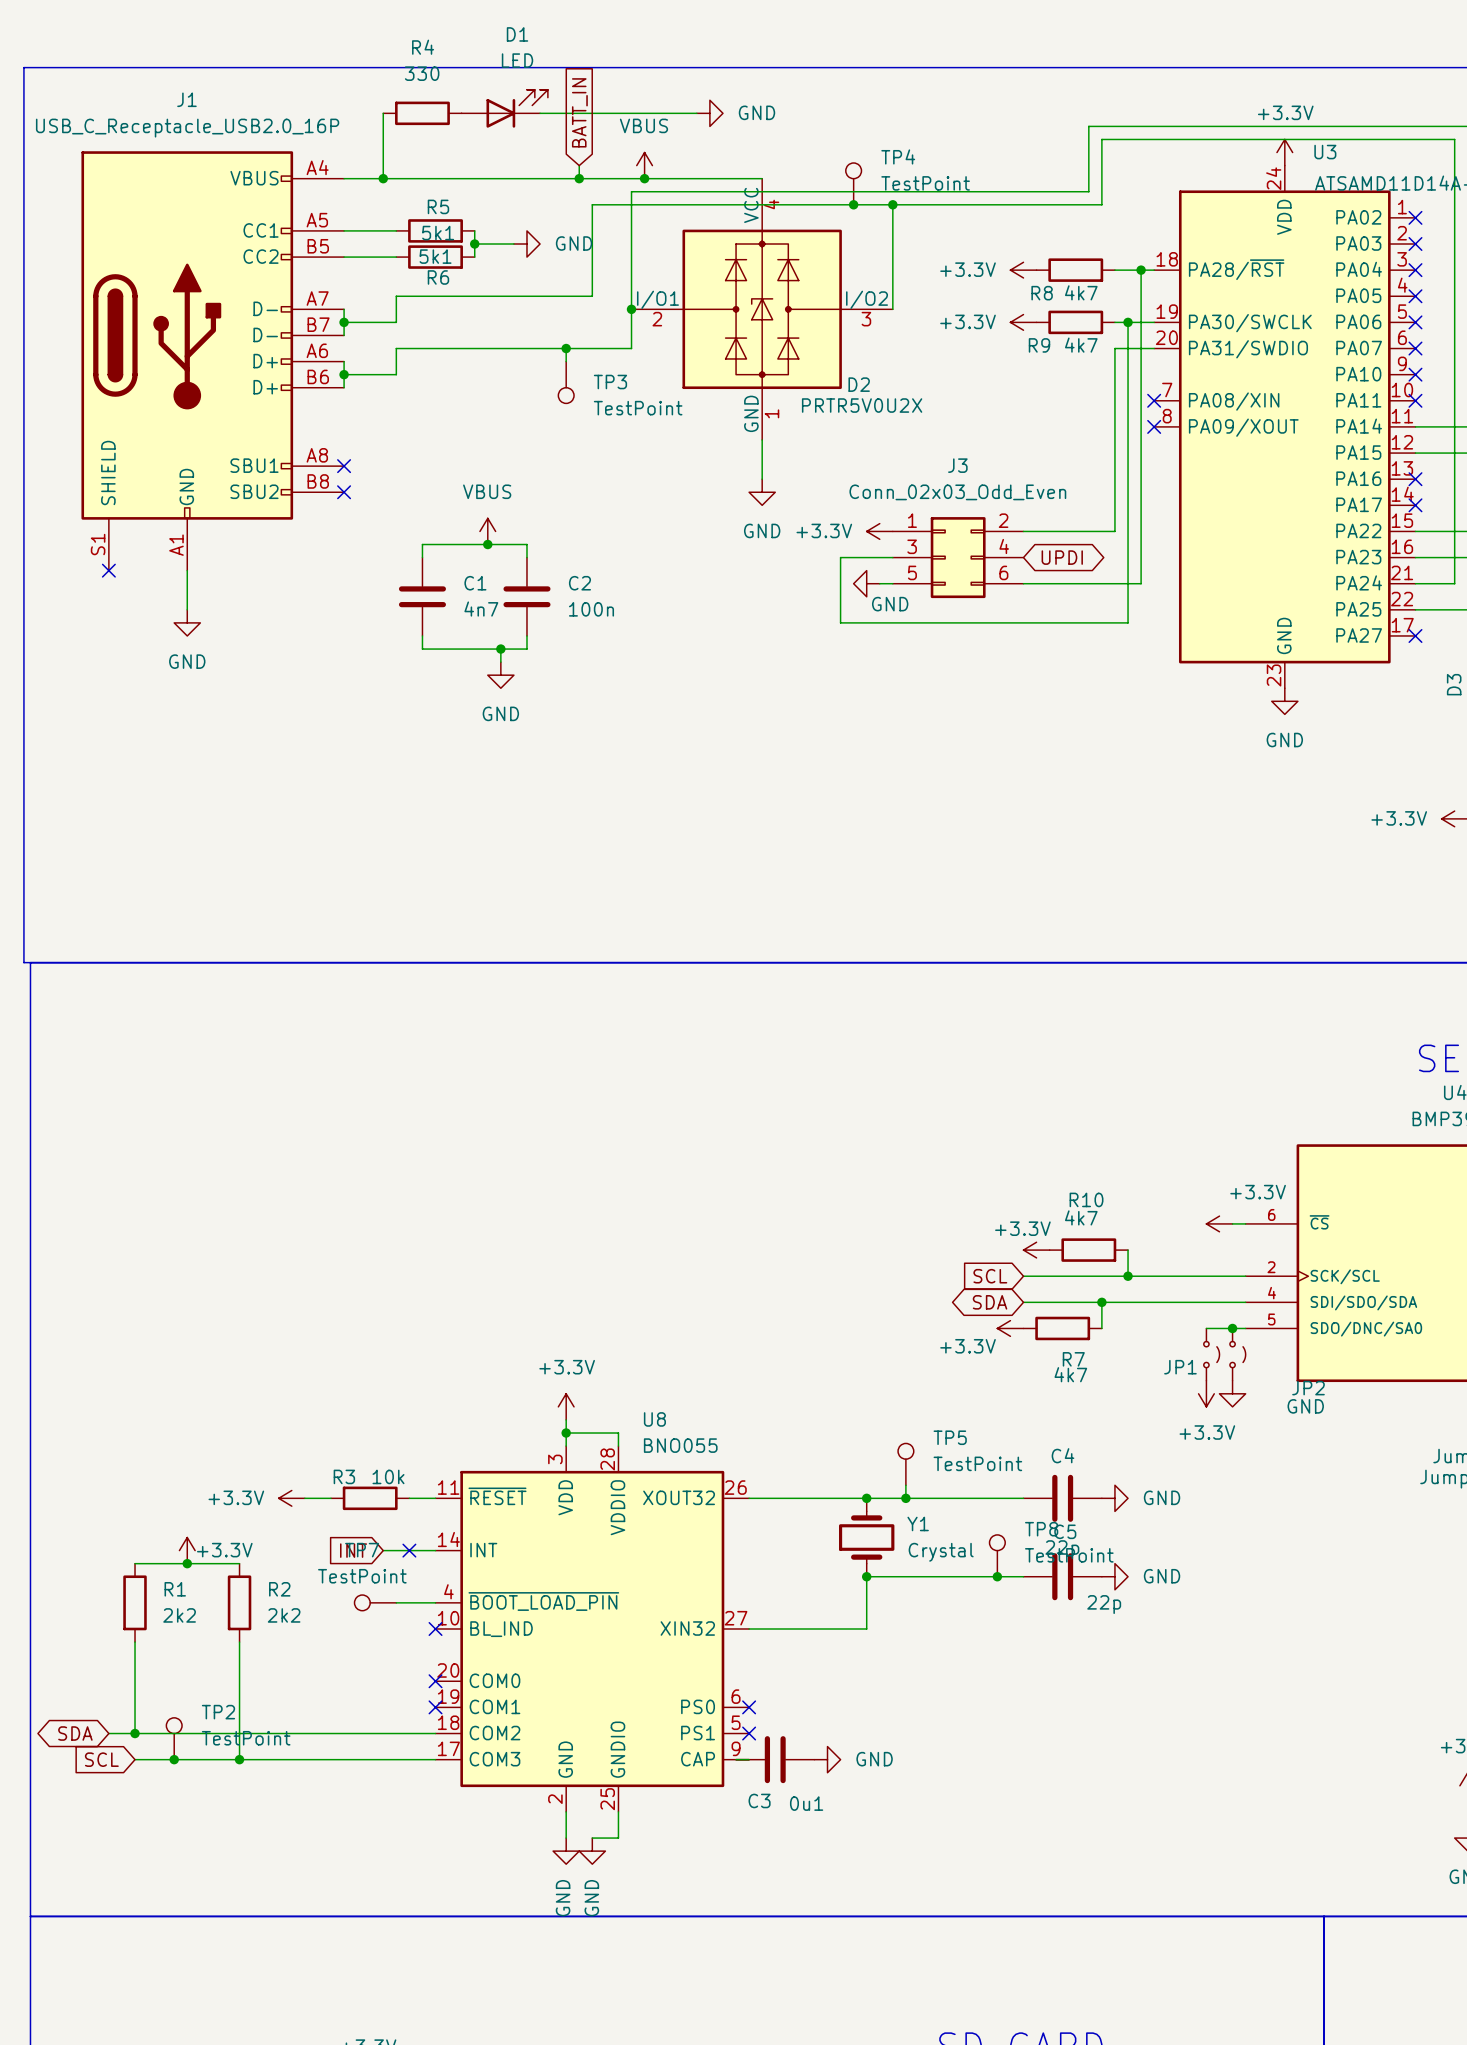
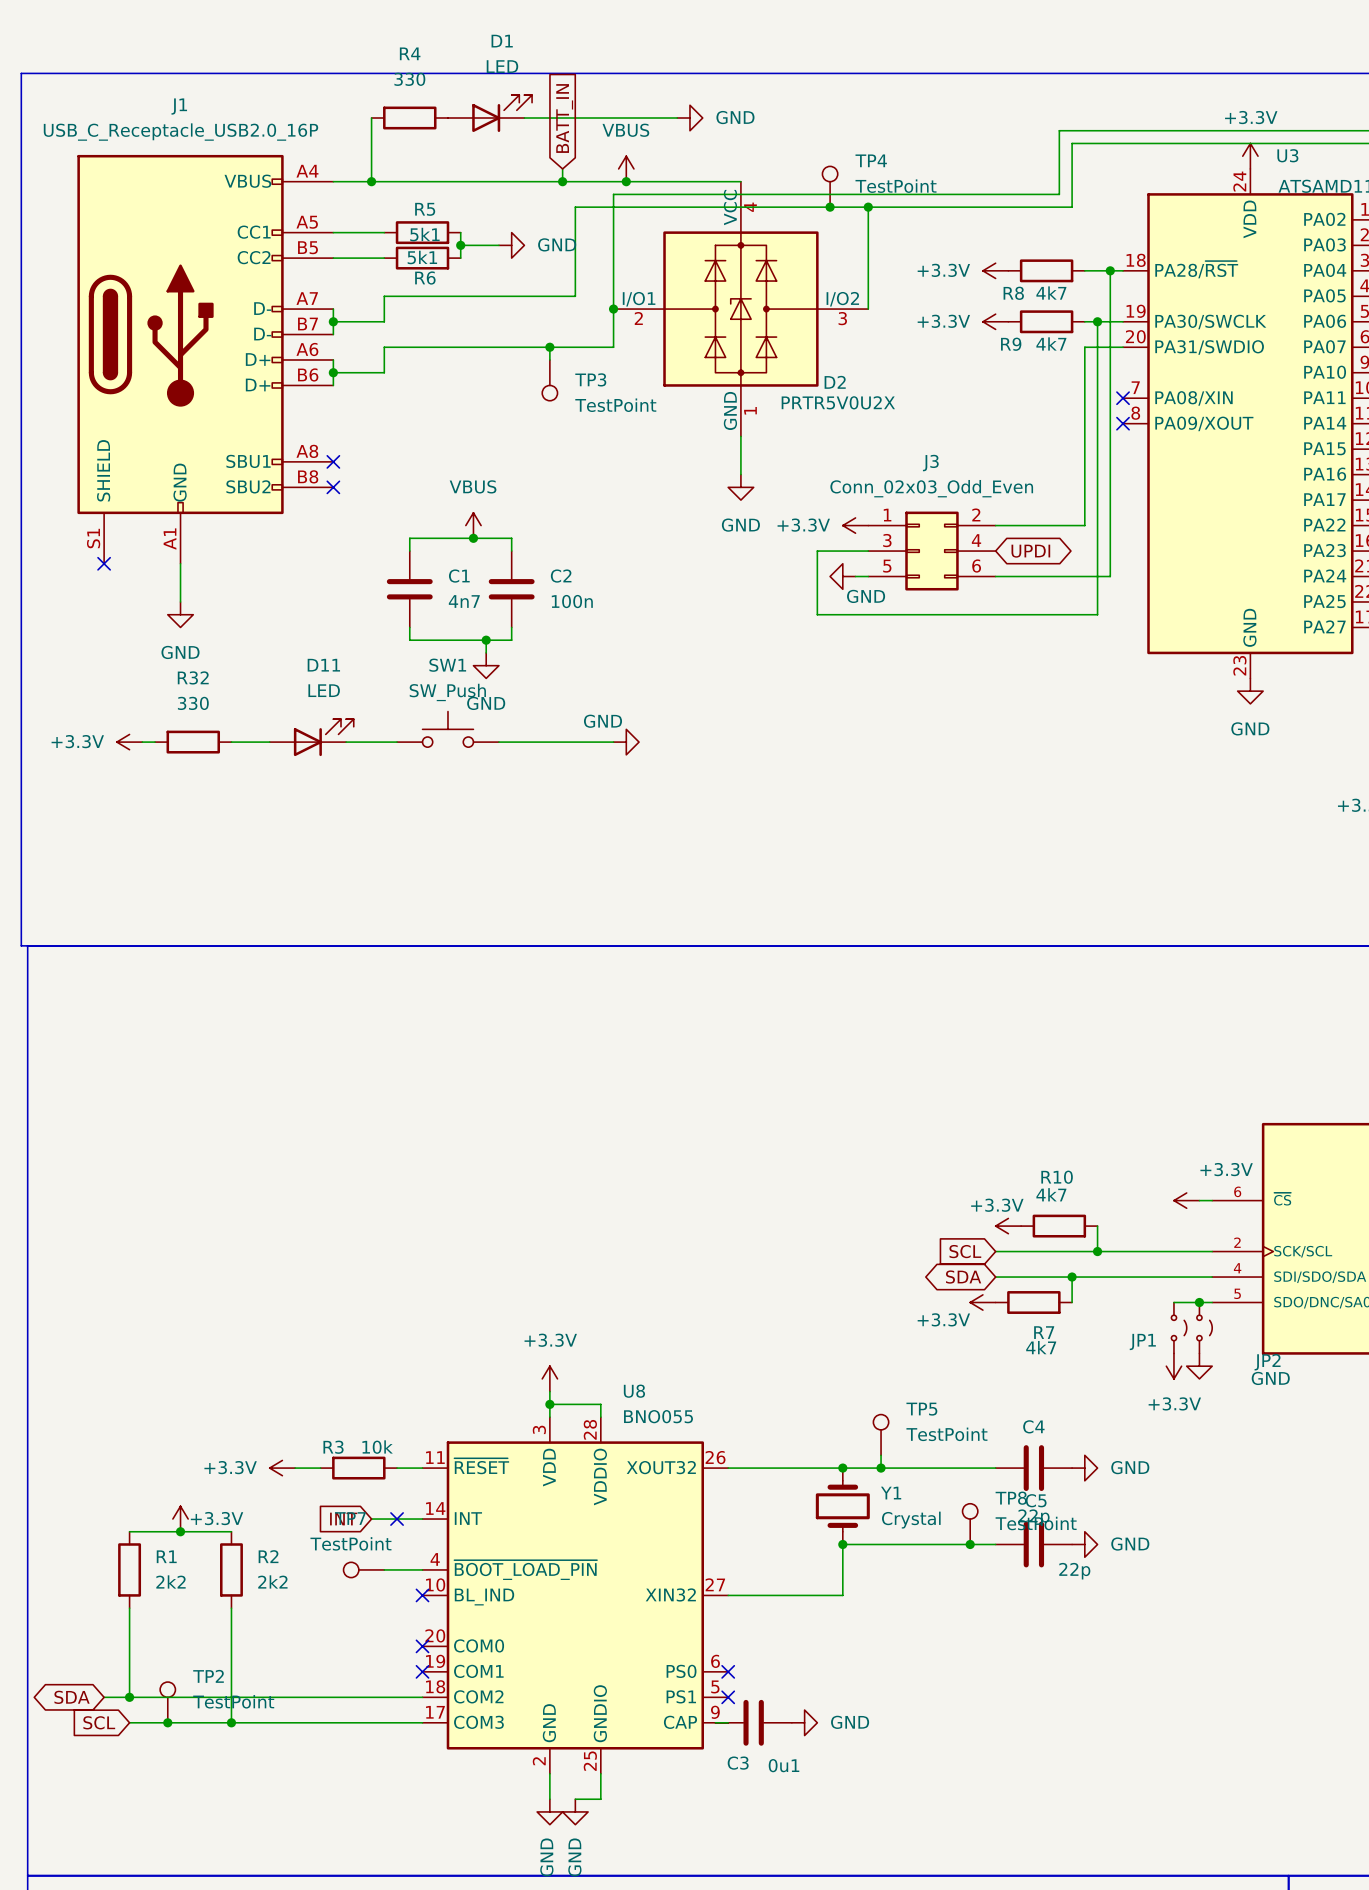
SW1: none -> SW_Push (447, 729)
D11: none -> LED (311, 737)
power symbol: none -> +3.3V (129, 742)
wire: none -> (142, 742) (155, 742)
R32: none -> 330 (193, 742)
wire: none -> (231, 742) (269, 742)
wire: none -> (346, 742) (397, 742)
wire: none -> (498, 742) (613, 742)
power symbol: none -> GND (626, 742)

